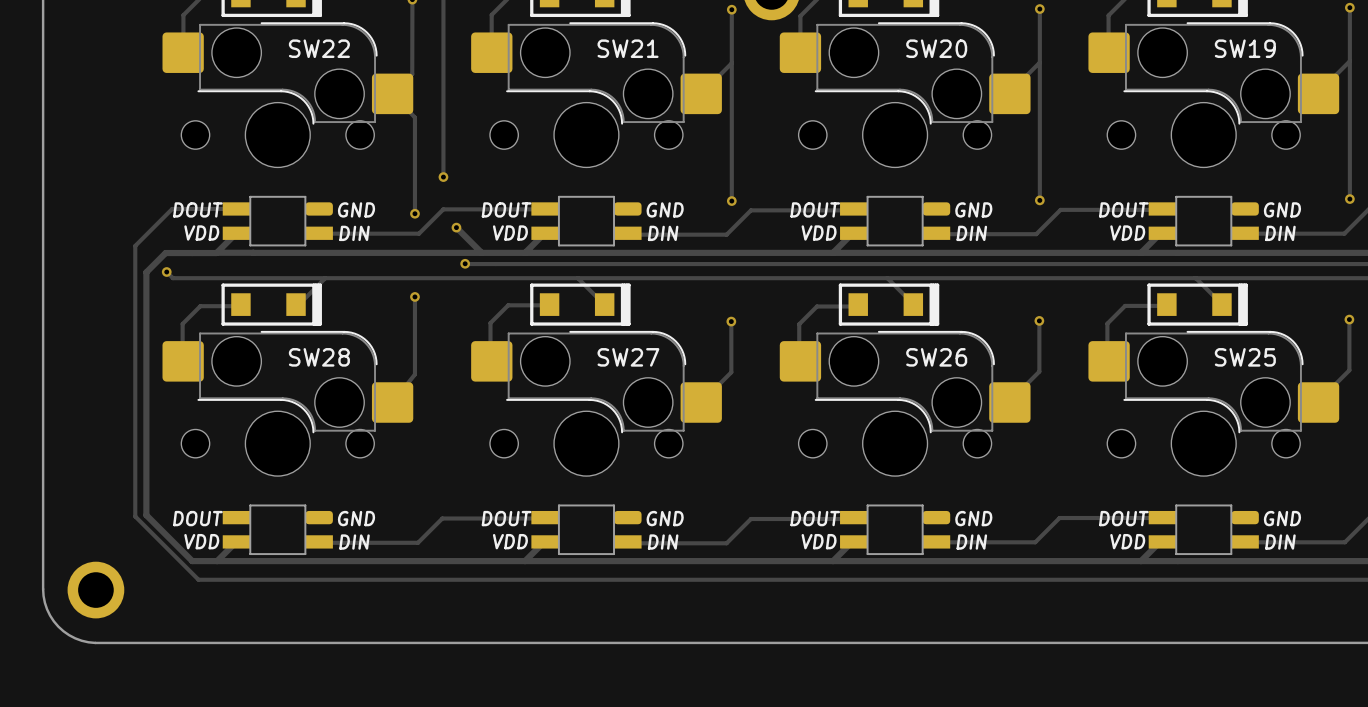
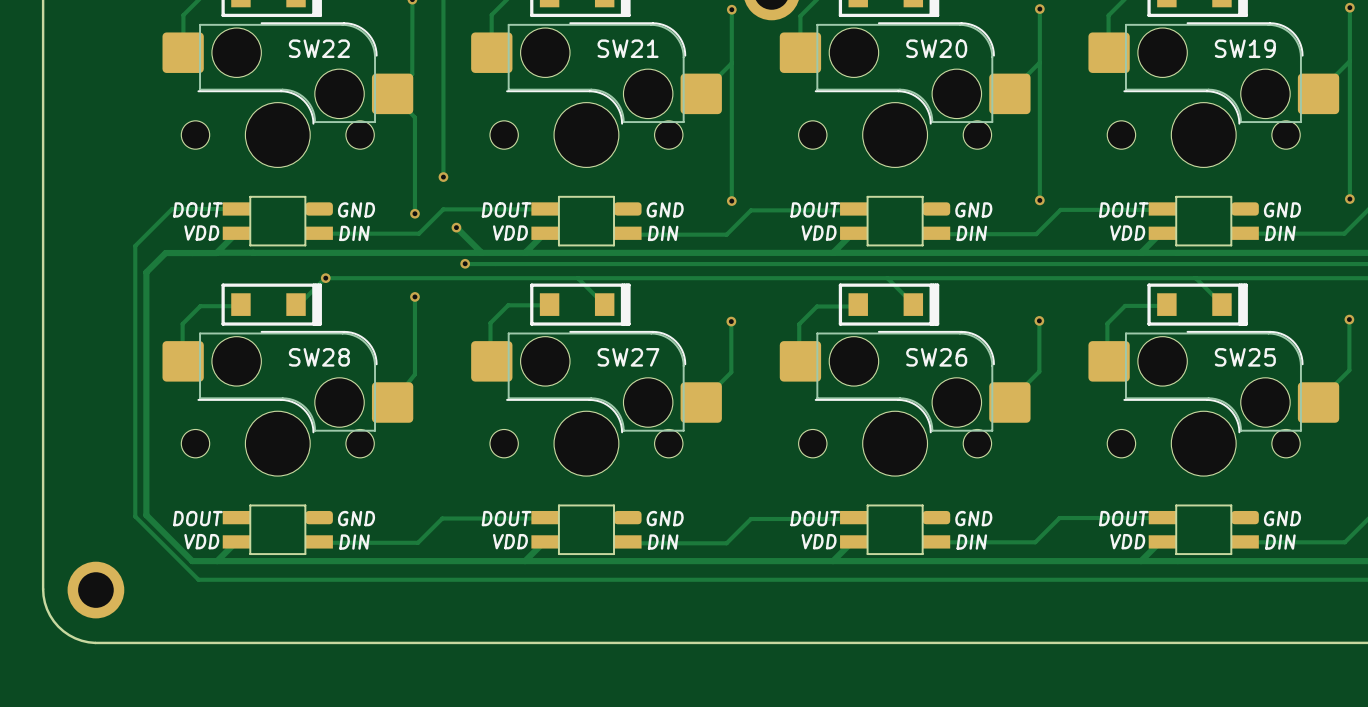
track: (166, 272) (172, 278) (325, 278) -> none
via: (166, 272) -> none
via: none -> (325, 278)

